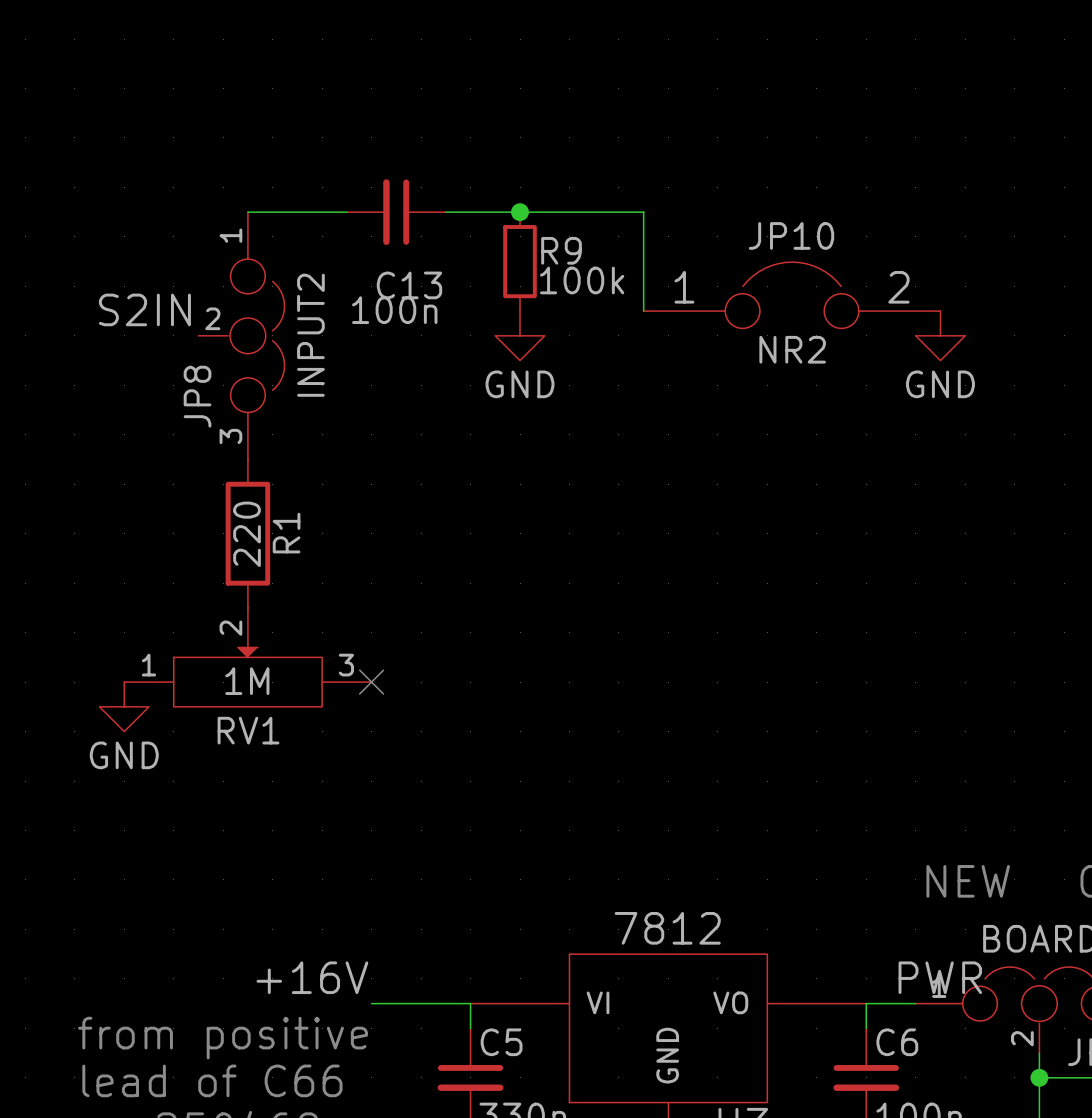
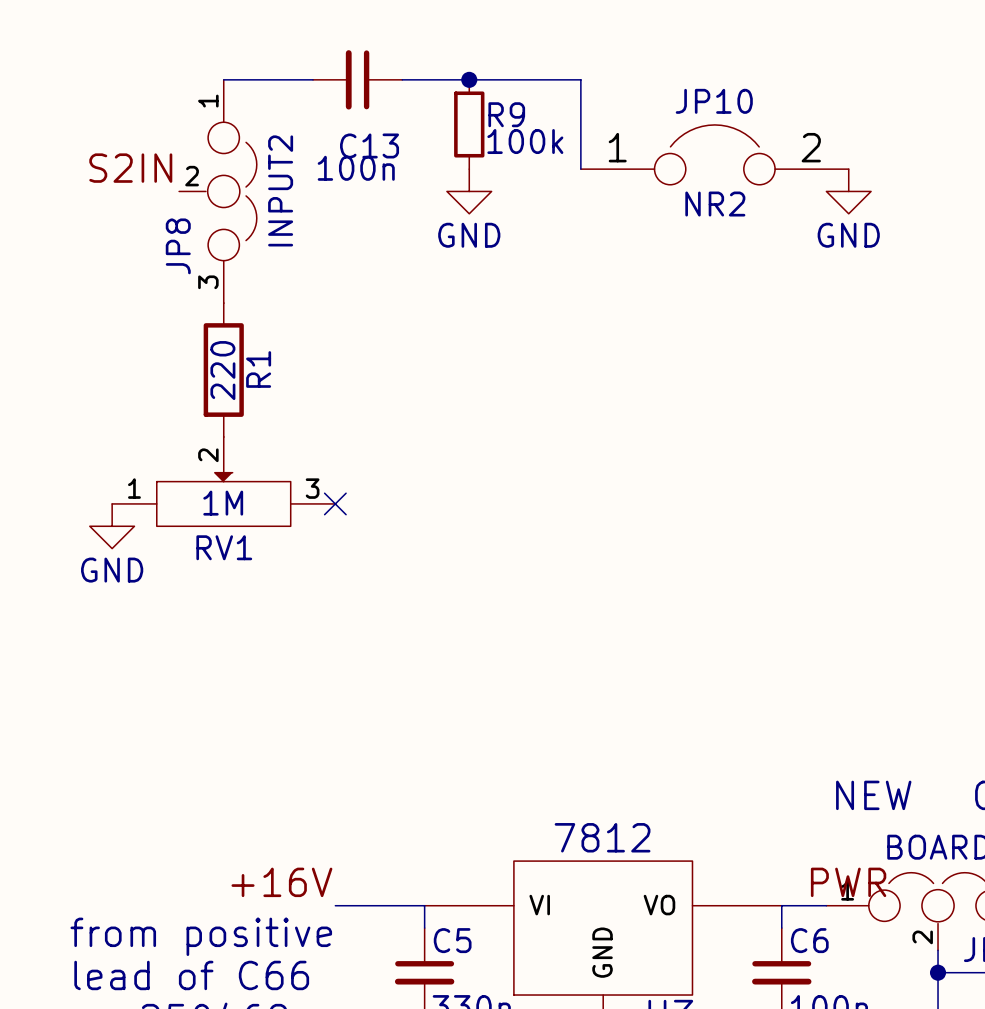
junction: none -> (469, 79)
wire: (247, 212) (346, 212) -> (223, 79) (313, 79)
C13 position: (396, 212) -> (357, 79)
wire: (445, 212) (643, 212) (643, 311) -> (402, 79) (580, 79) (580, 169)
junction: (520, 212) -> none
R9 position: (520, 261) -> (469, 124)
JP10 position: (792, 295) -> (714, 154)
label position: S2IN (144, 309) -> S2IN (130, 168)
JP8 position: (241, 335) -> (217, 191)
power symbol position: GND (520, 335) -> GND (469, 191)
power symbol position: GND (940, 335) -> GND (848, 191)
R1 position: (247, 533) -> (223, 370)
no-connect mark: none -> (335, 503)
RV1 position: (247, 657) -> (223, 481)
no-connect mark: (371, 682) -> none
power symbol position: GND (124, 706) -> GND (112, 526)

